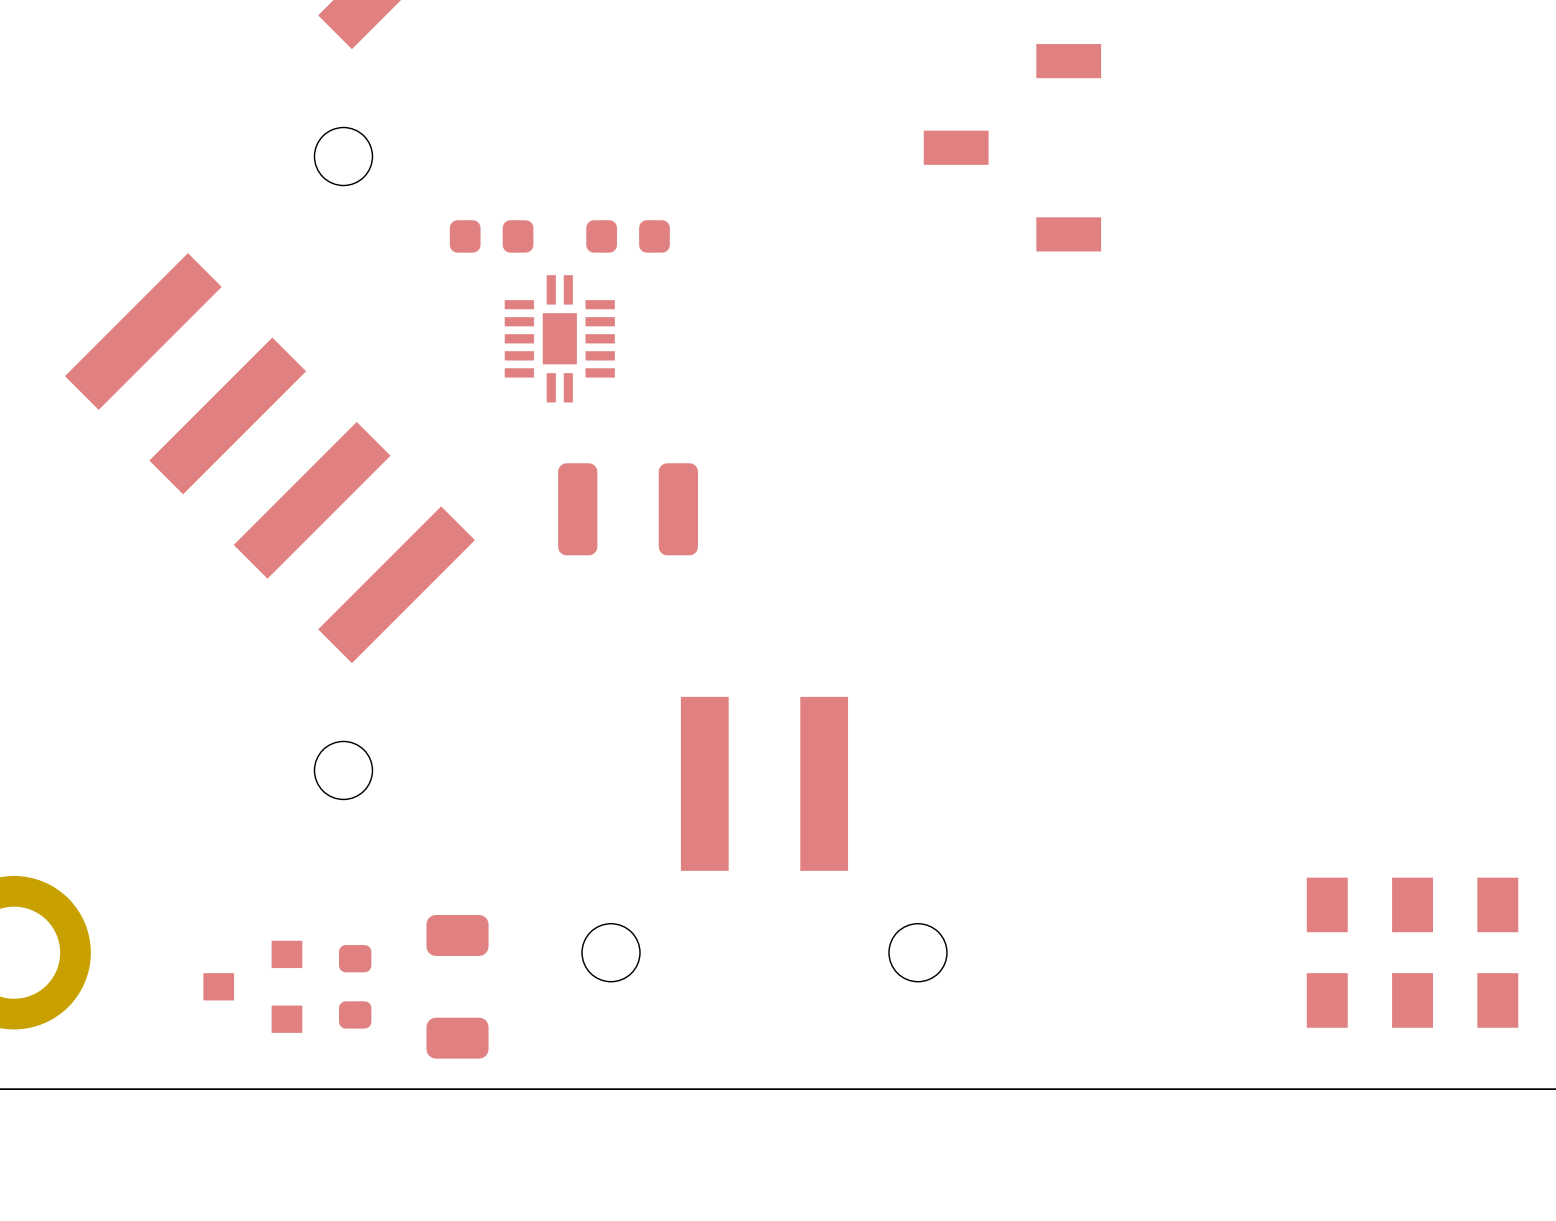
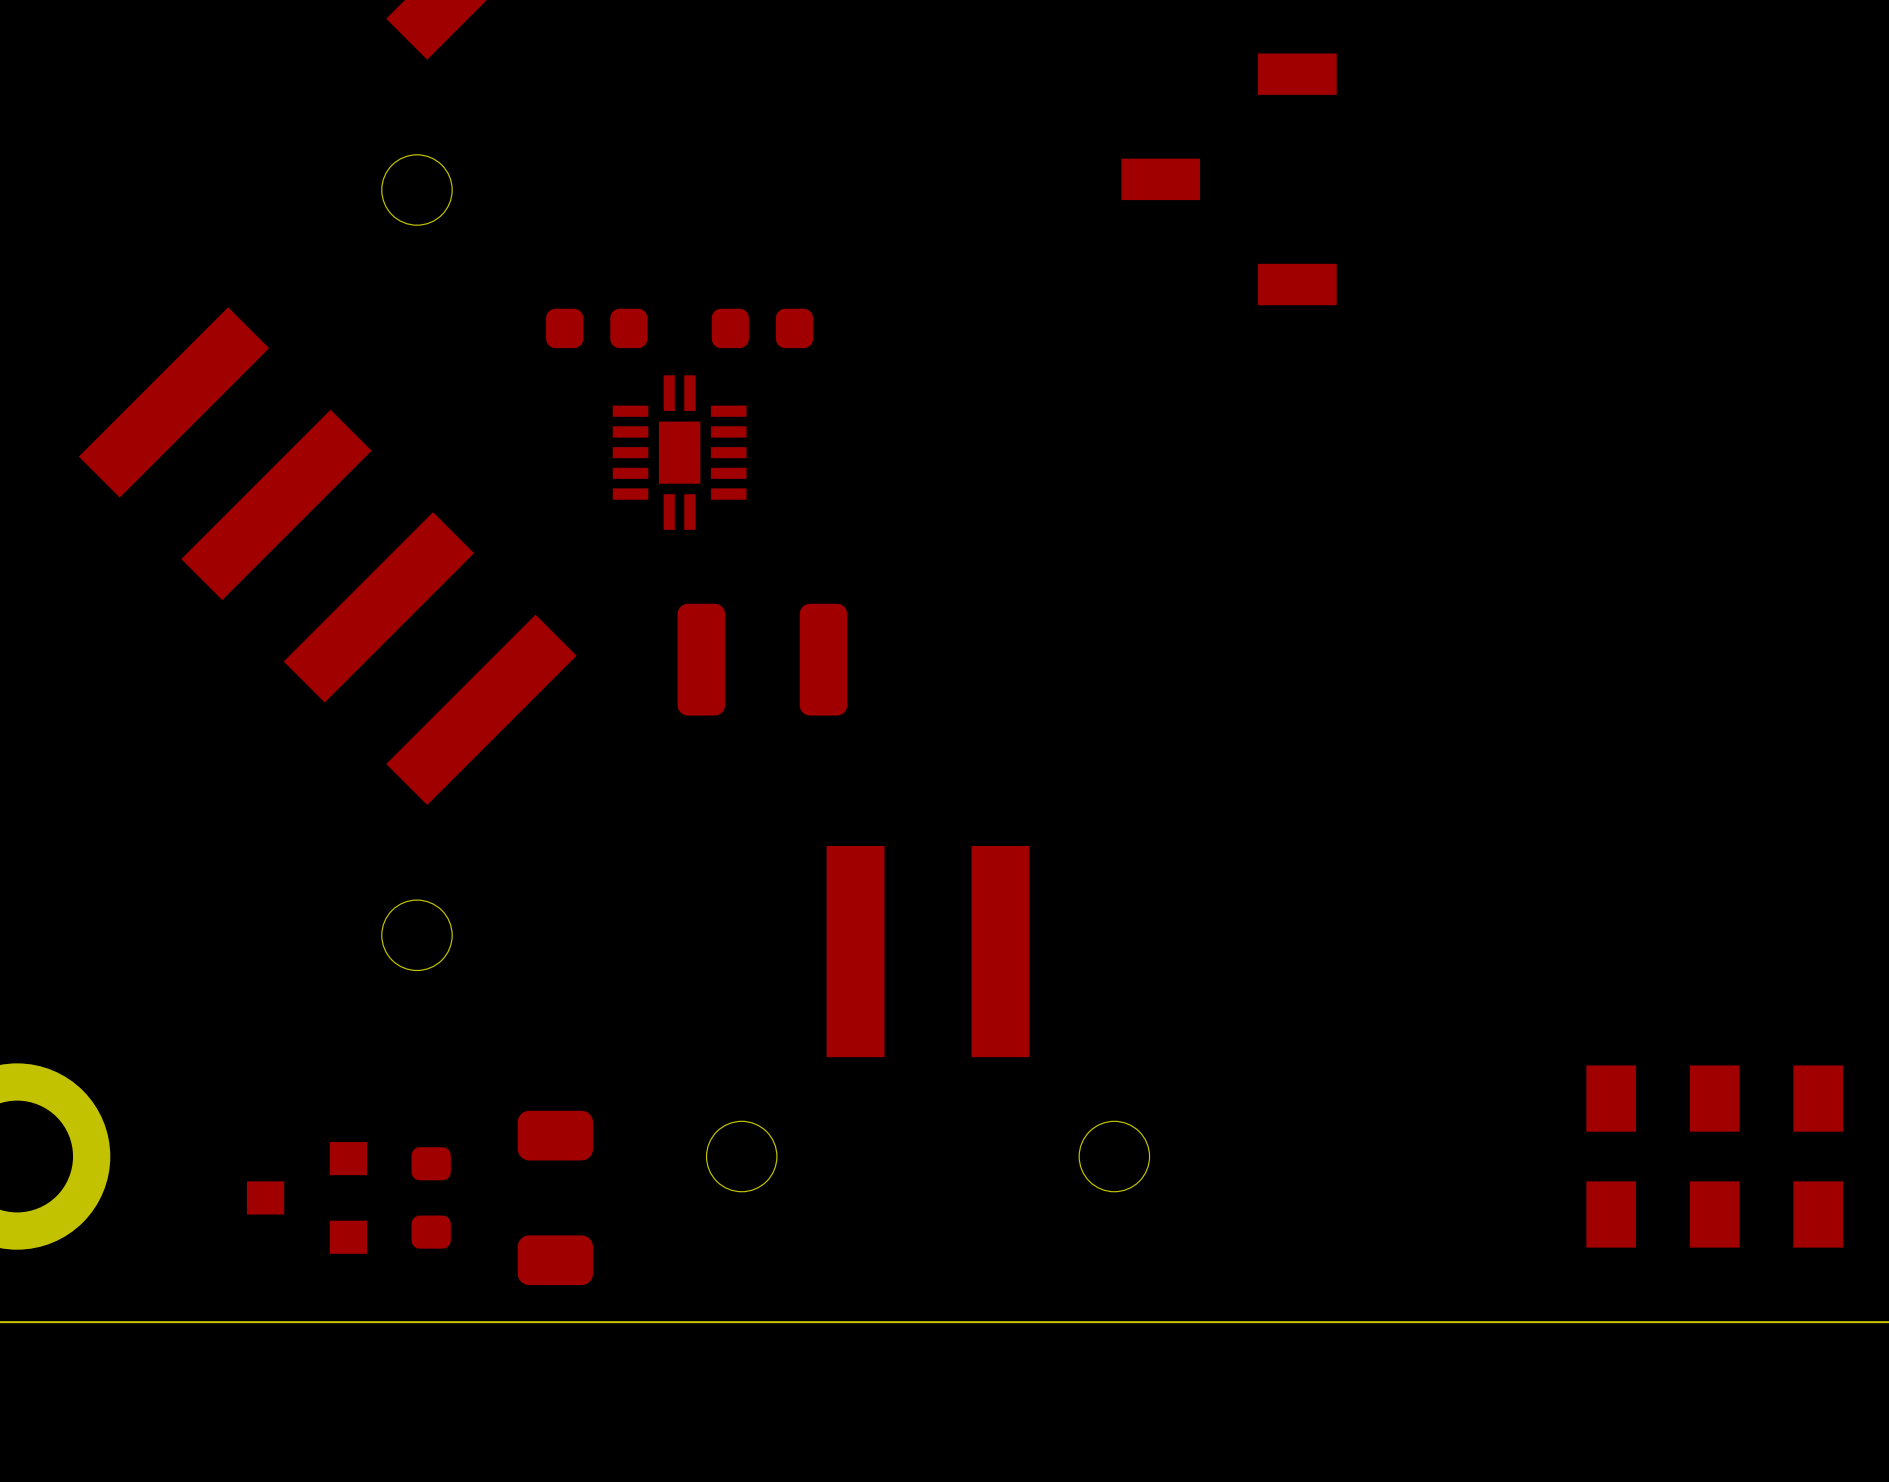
part position: (491, 236) -> (596, 328)
part position: (628, 236) -> (762, 328)
part position: (559, 338) -> (679, 452)
part position: (628, 509) -> (762, 659)

